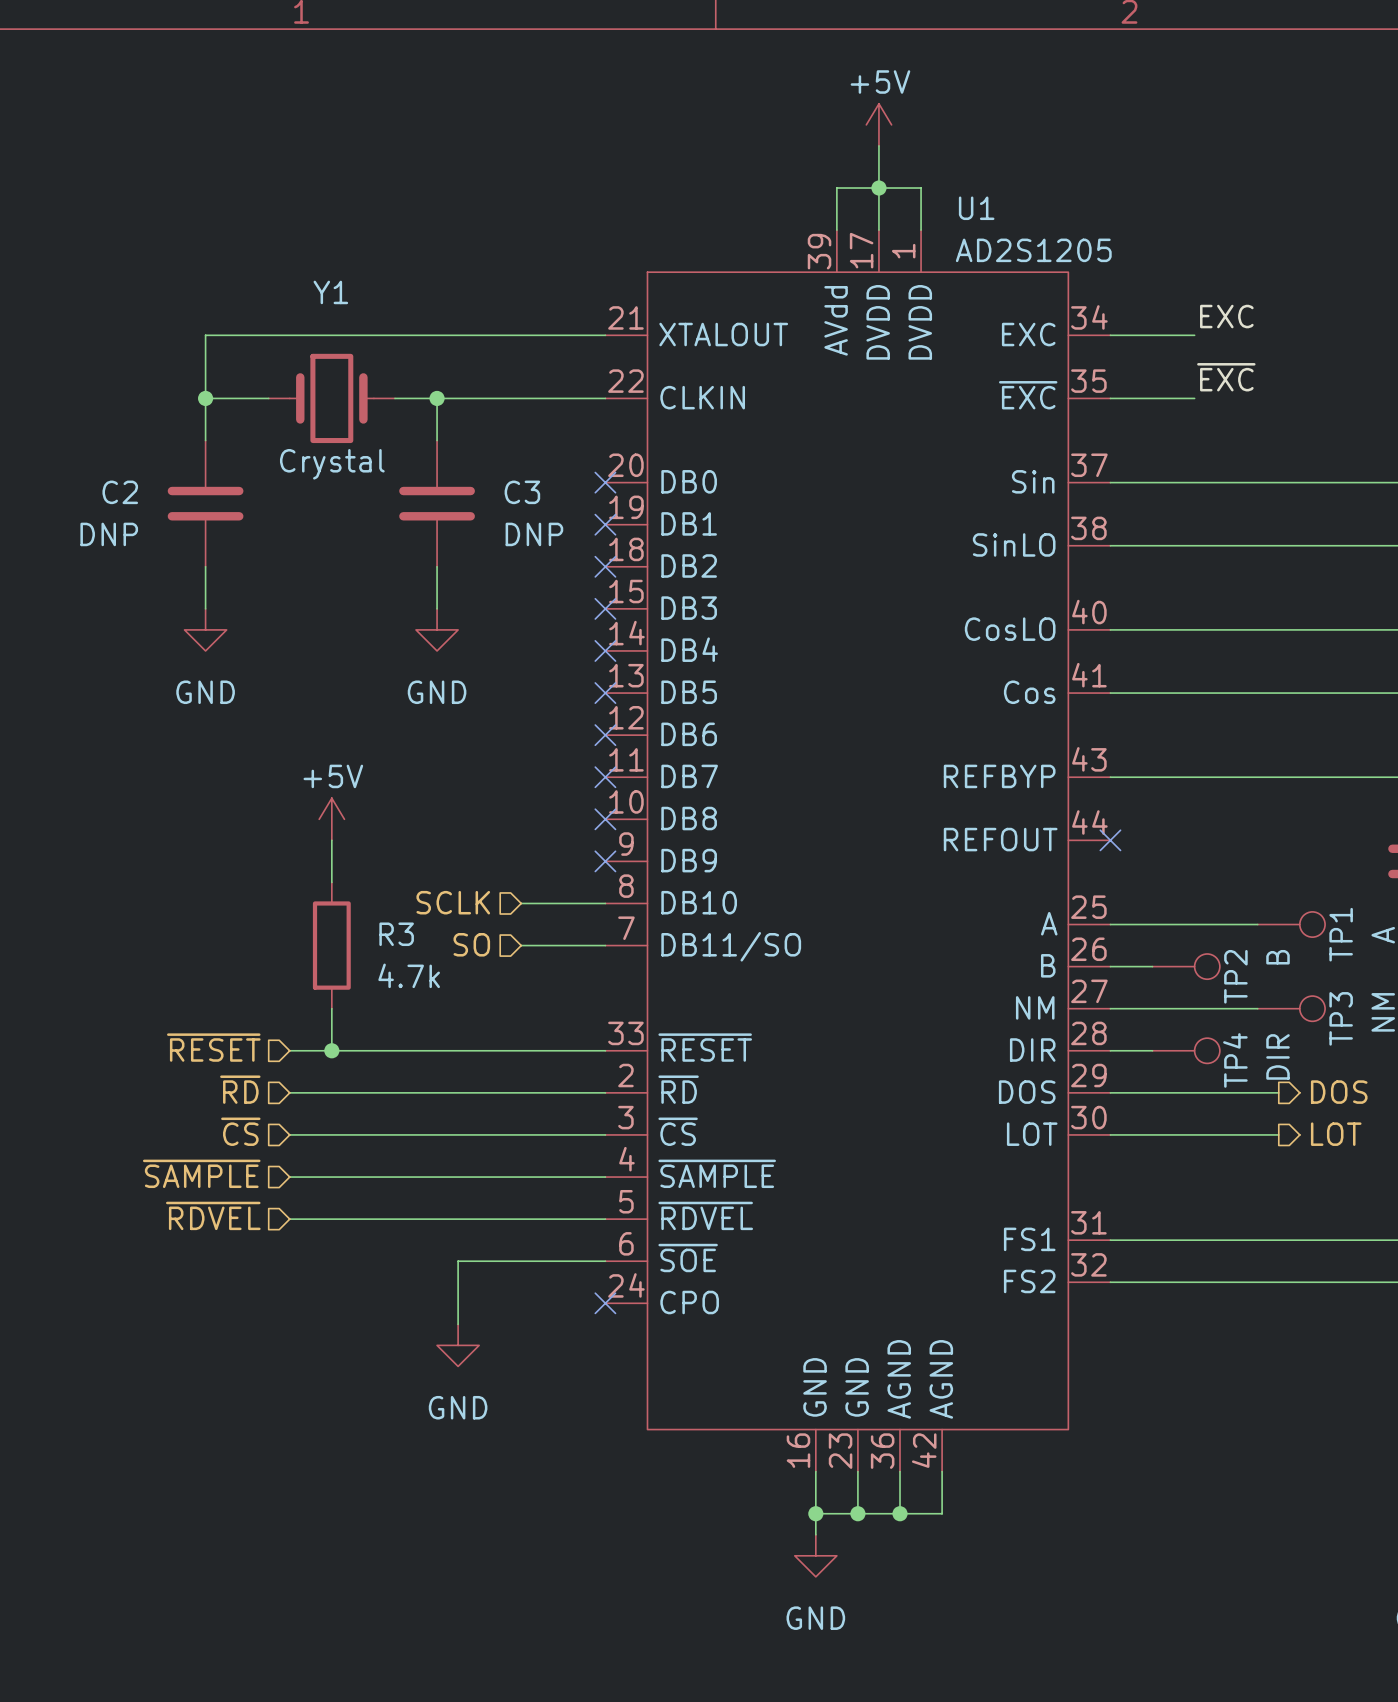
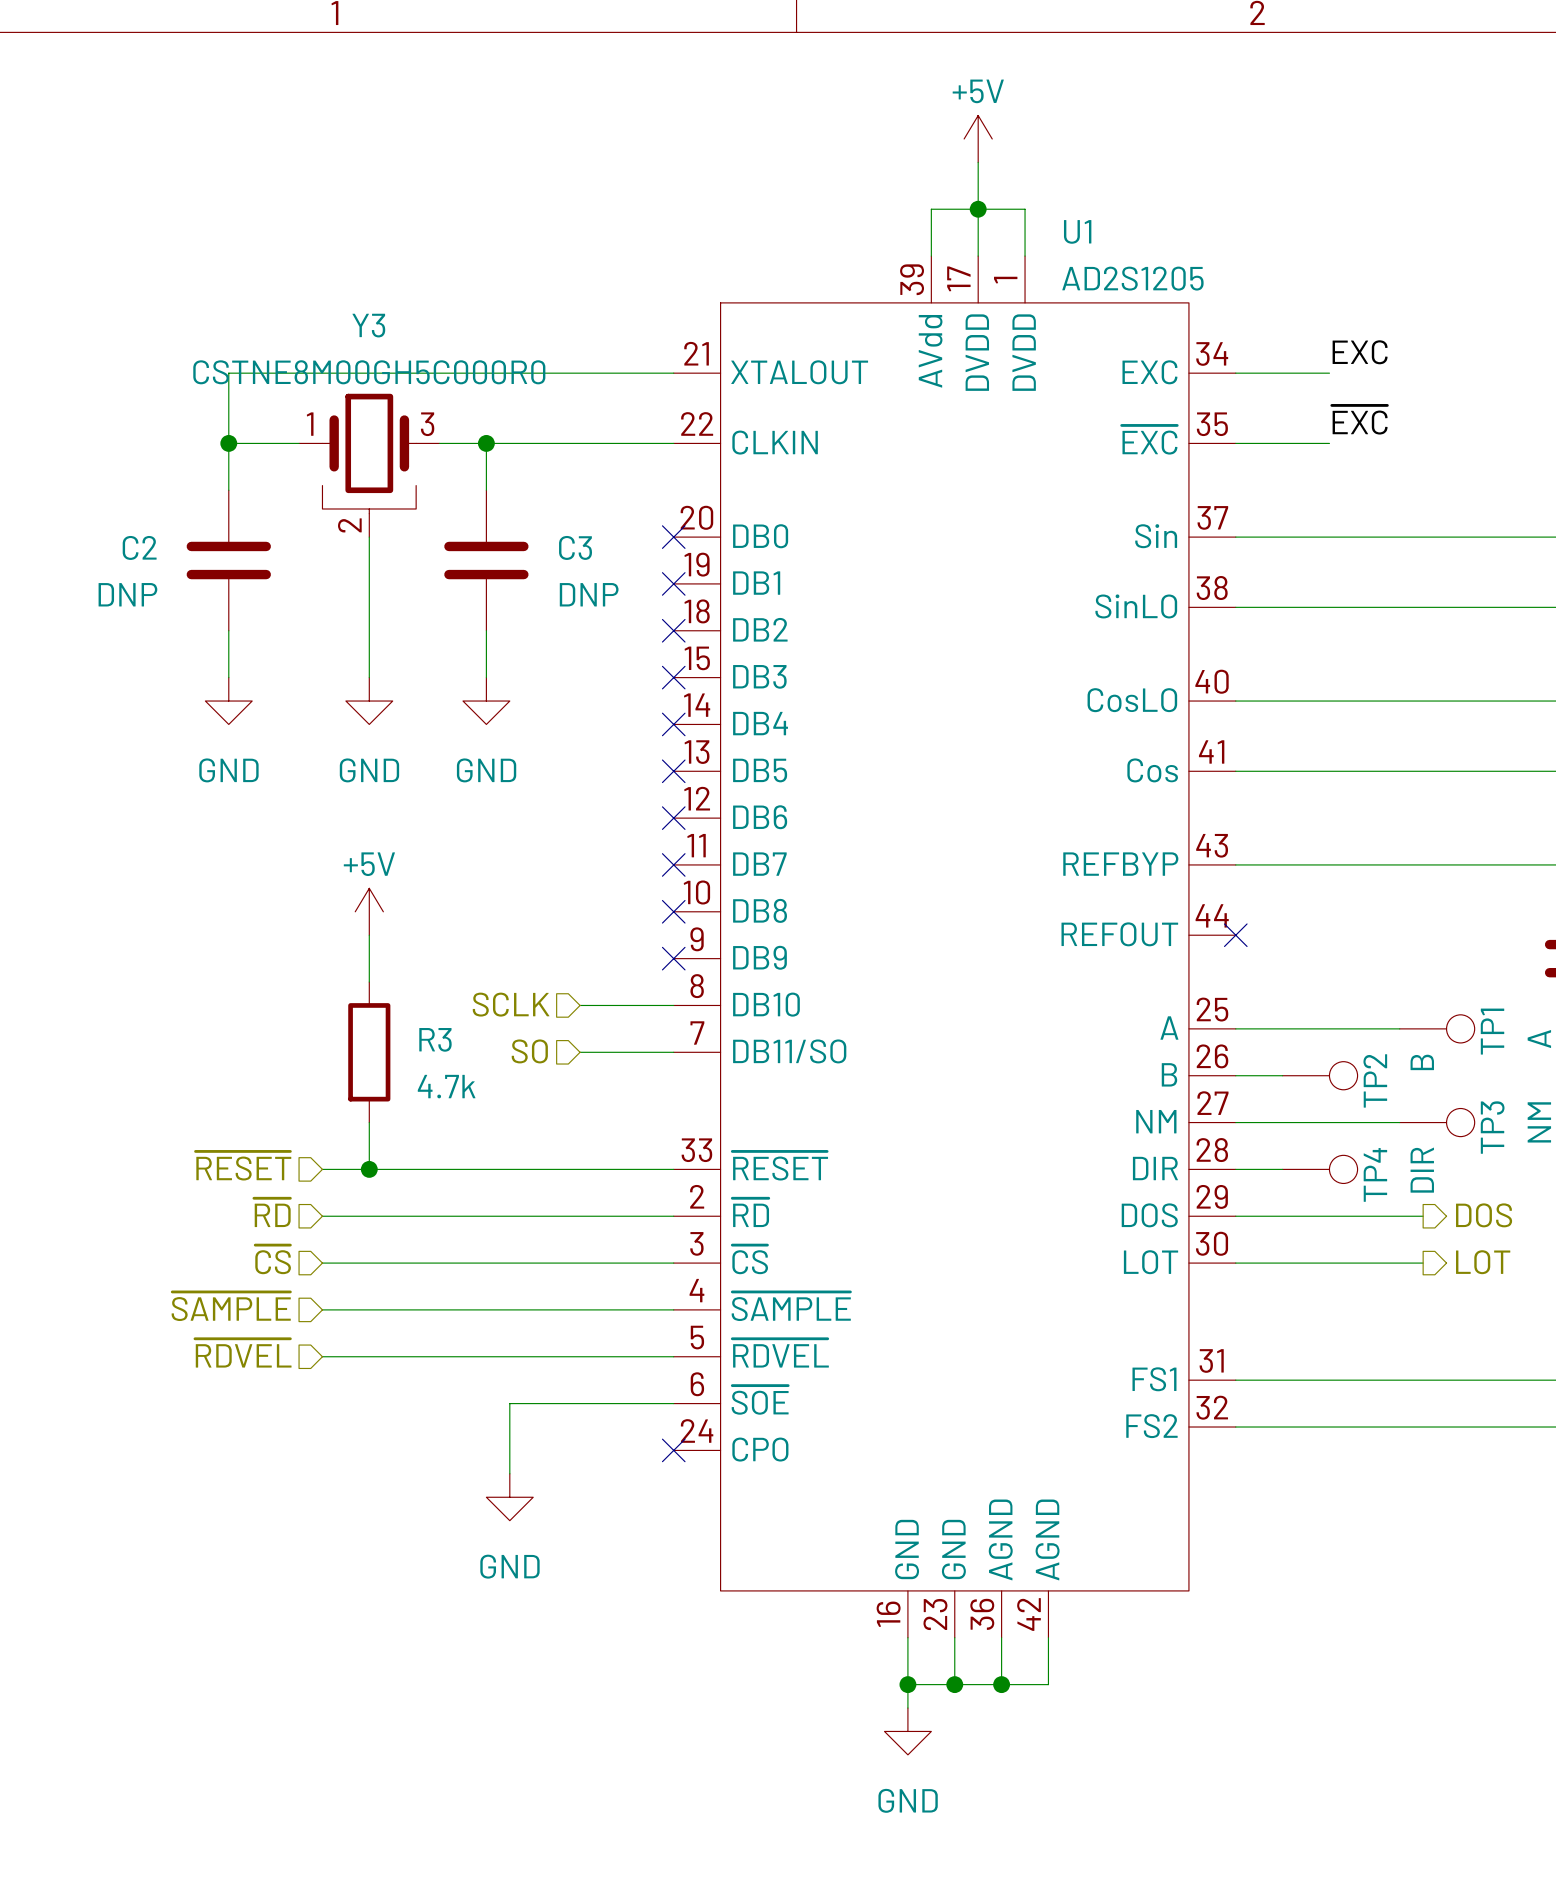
Y1: Crystal (331, 398) -> none
Y3: none -> CSTNE8M00GH5C000R0 (369, 465)
wire: none -> (369, 537) (369, 677)
power symbol: none -> GND (369, 701)

